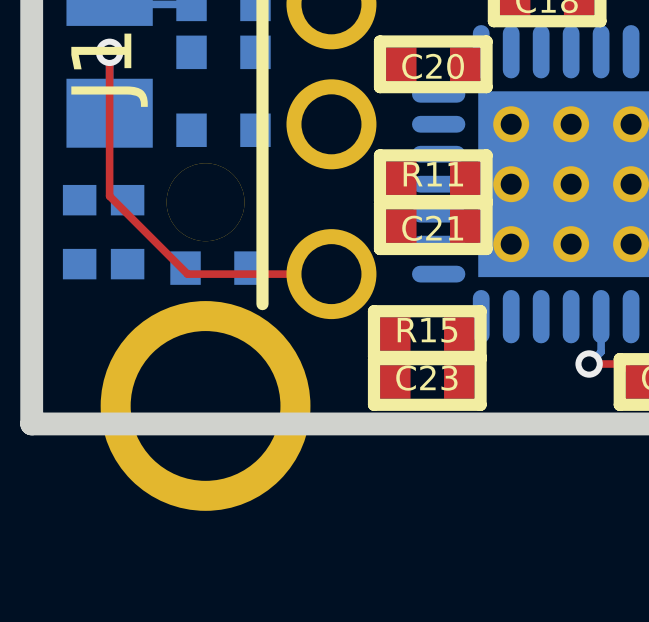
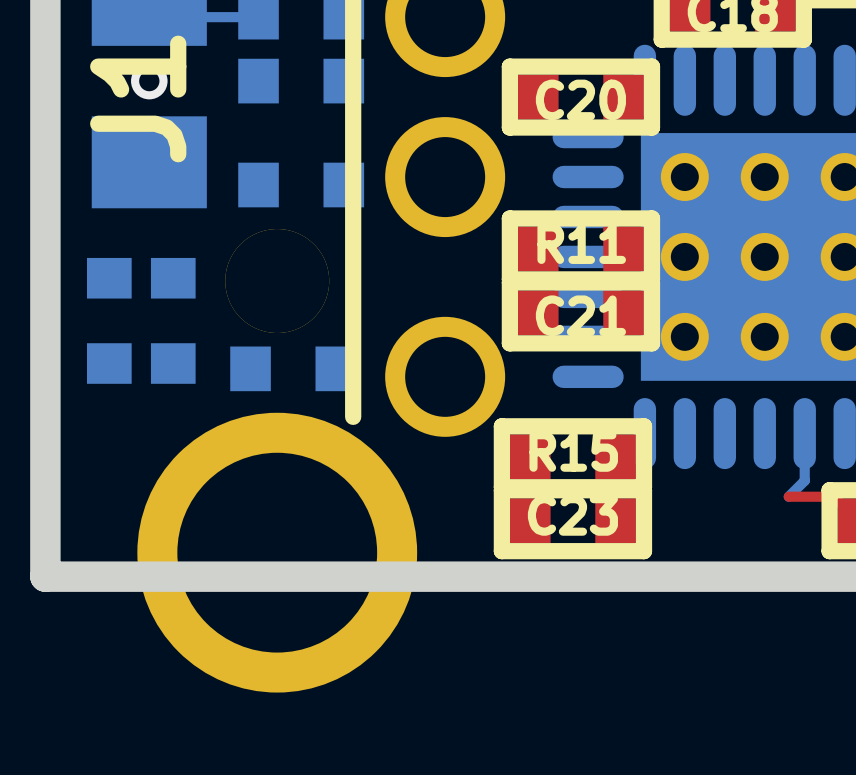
top track: (109, 52) (109, 196) (187, 274) (331, 274) -> none
via: (589, 364) -> none

